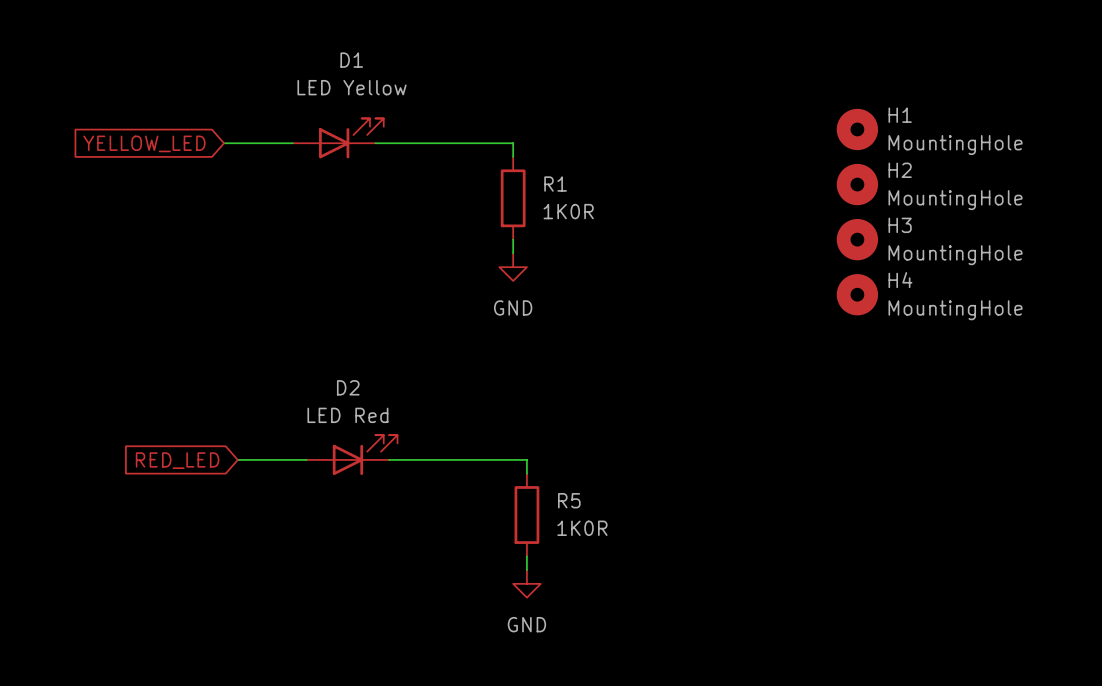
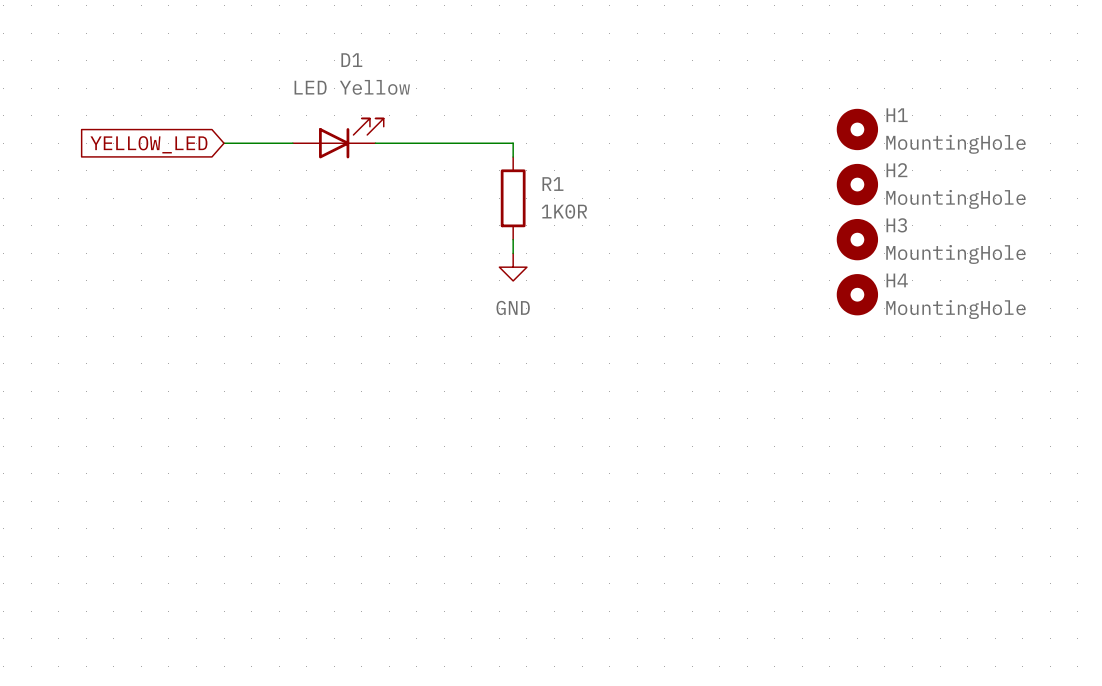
D2: LED Red (352, 455) -> none
wire: (237, 459) (306, 459) -> none
wire: (389, 459) (526, 459) (526, 473) -> none
global label: RED_LED (177, 460) -> none
R5: 1K0R (526, 515) -> none
wire: (526, 556) (526, 570) -> none
power symbol: GND (526, 583) -> none

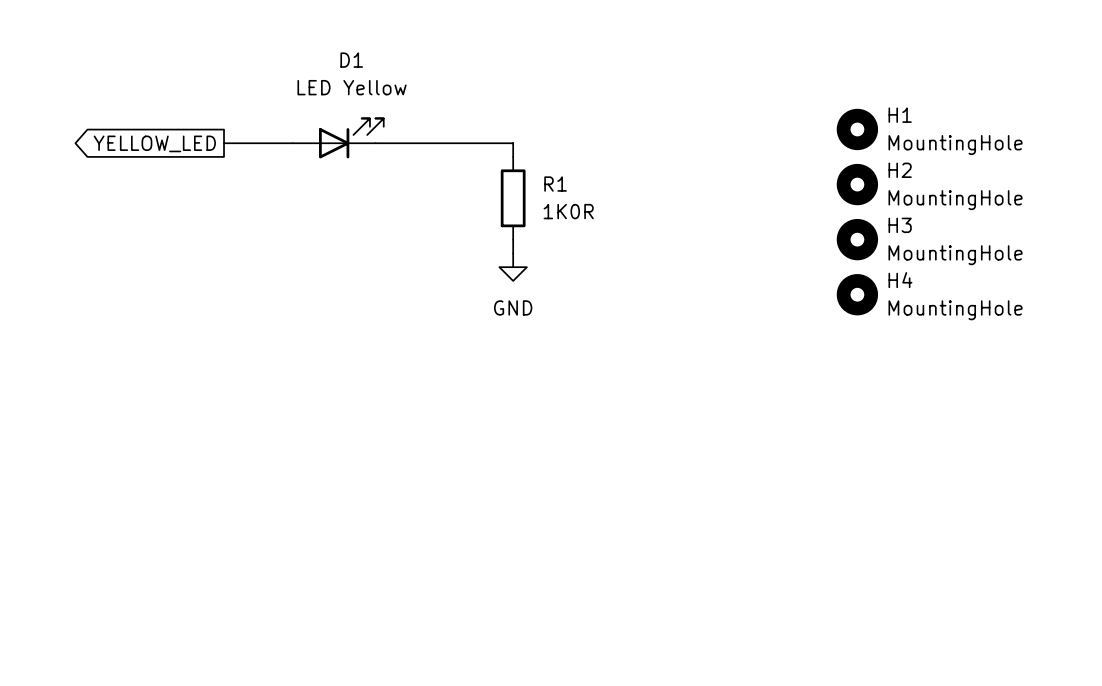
global label shape: input (148, 144) -> output (154, 143)

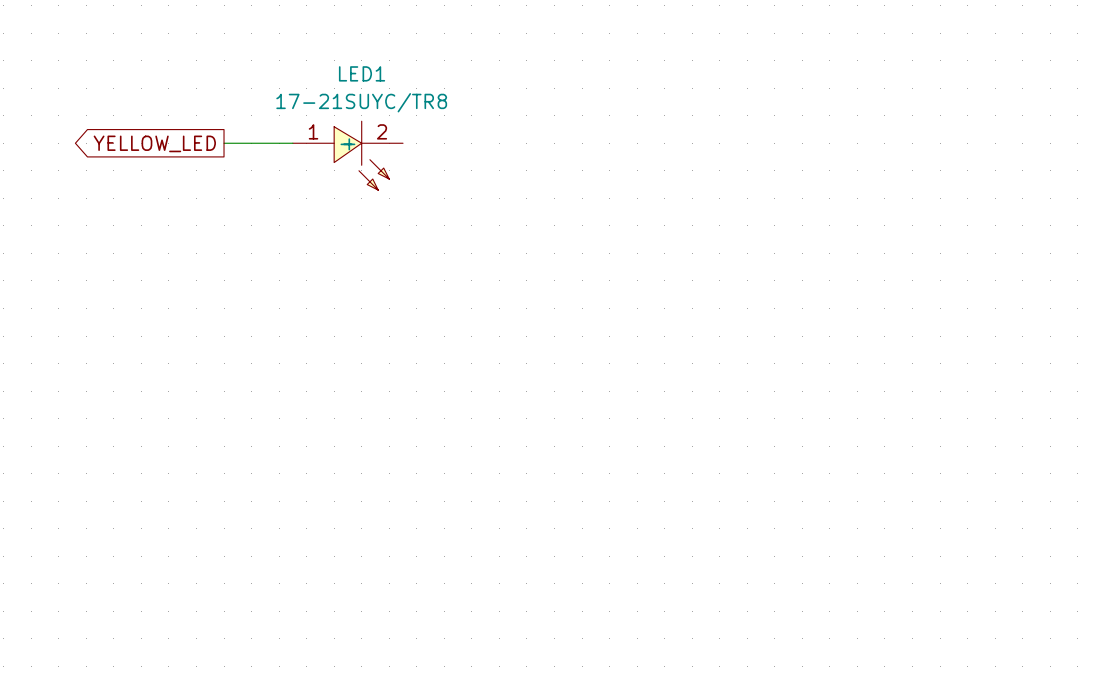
H1: MountingHole (857, 129) -> none
D1: LED Yellow (338, 138) -> none
wire: (375, 143) (513, 143) (513, 157) -> none
LED1: none -> 17-21SUYC/TR8 (347, 155)
H2: MountingHole (857, 184) -> none
R1: 1K0R (513, 198) -> none
wire: (513, 239) (513, 253) -> none
H3: MountingHole (857, 239) -> none
power symbol: GND (513, 267) -> none
H4: MountingHole (857, 294) -> none

